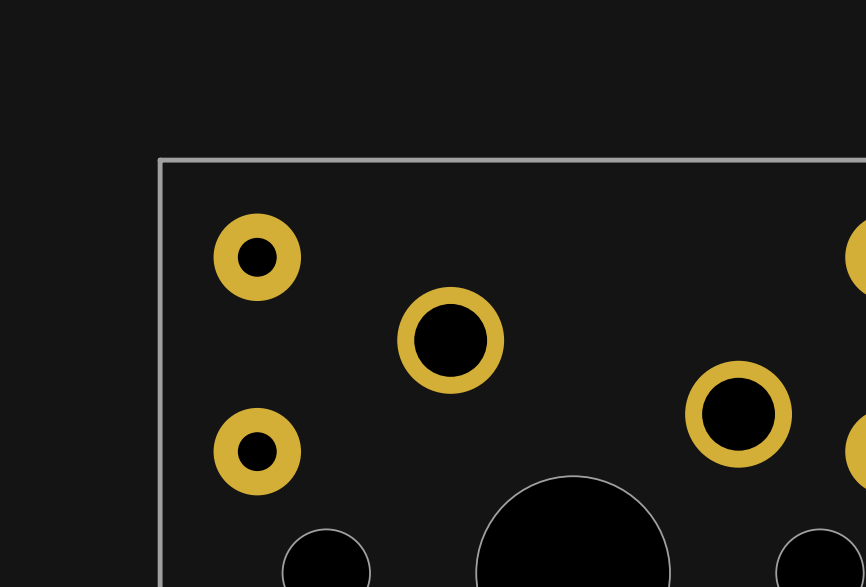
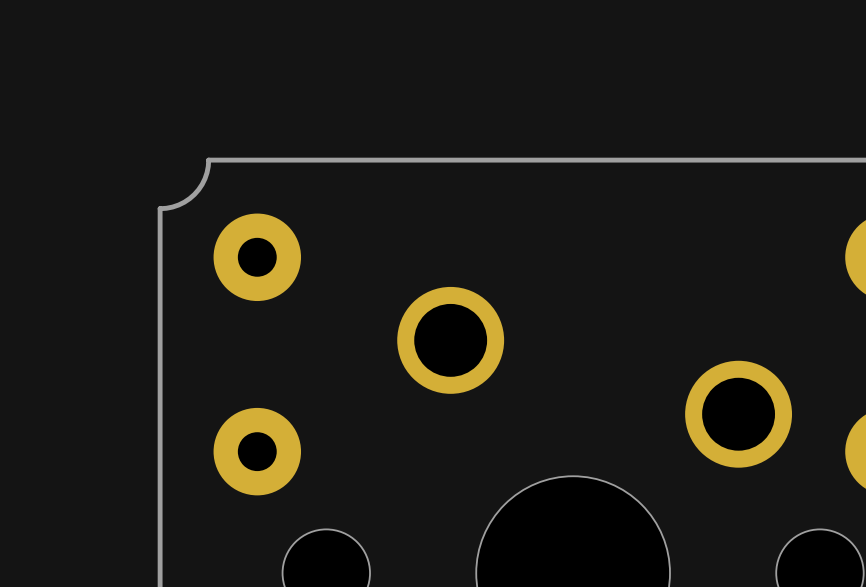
board edge: (208, 160) (160, 160) (160, 208) -> (208, 160) (205, 178) (194, 194) (178, 205) (160, 208)

